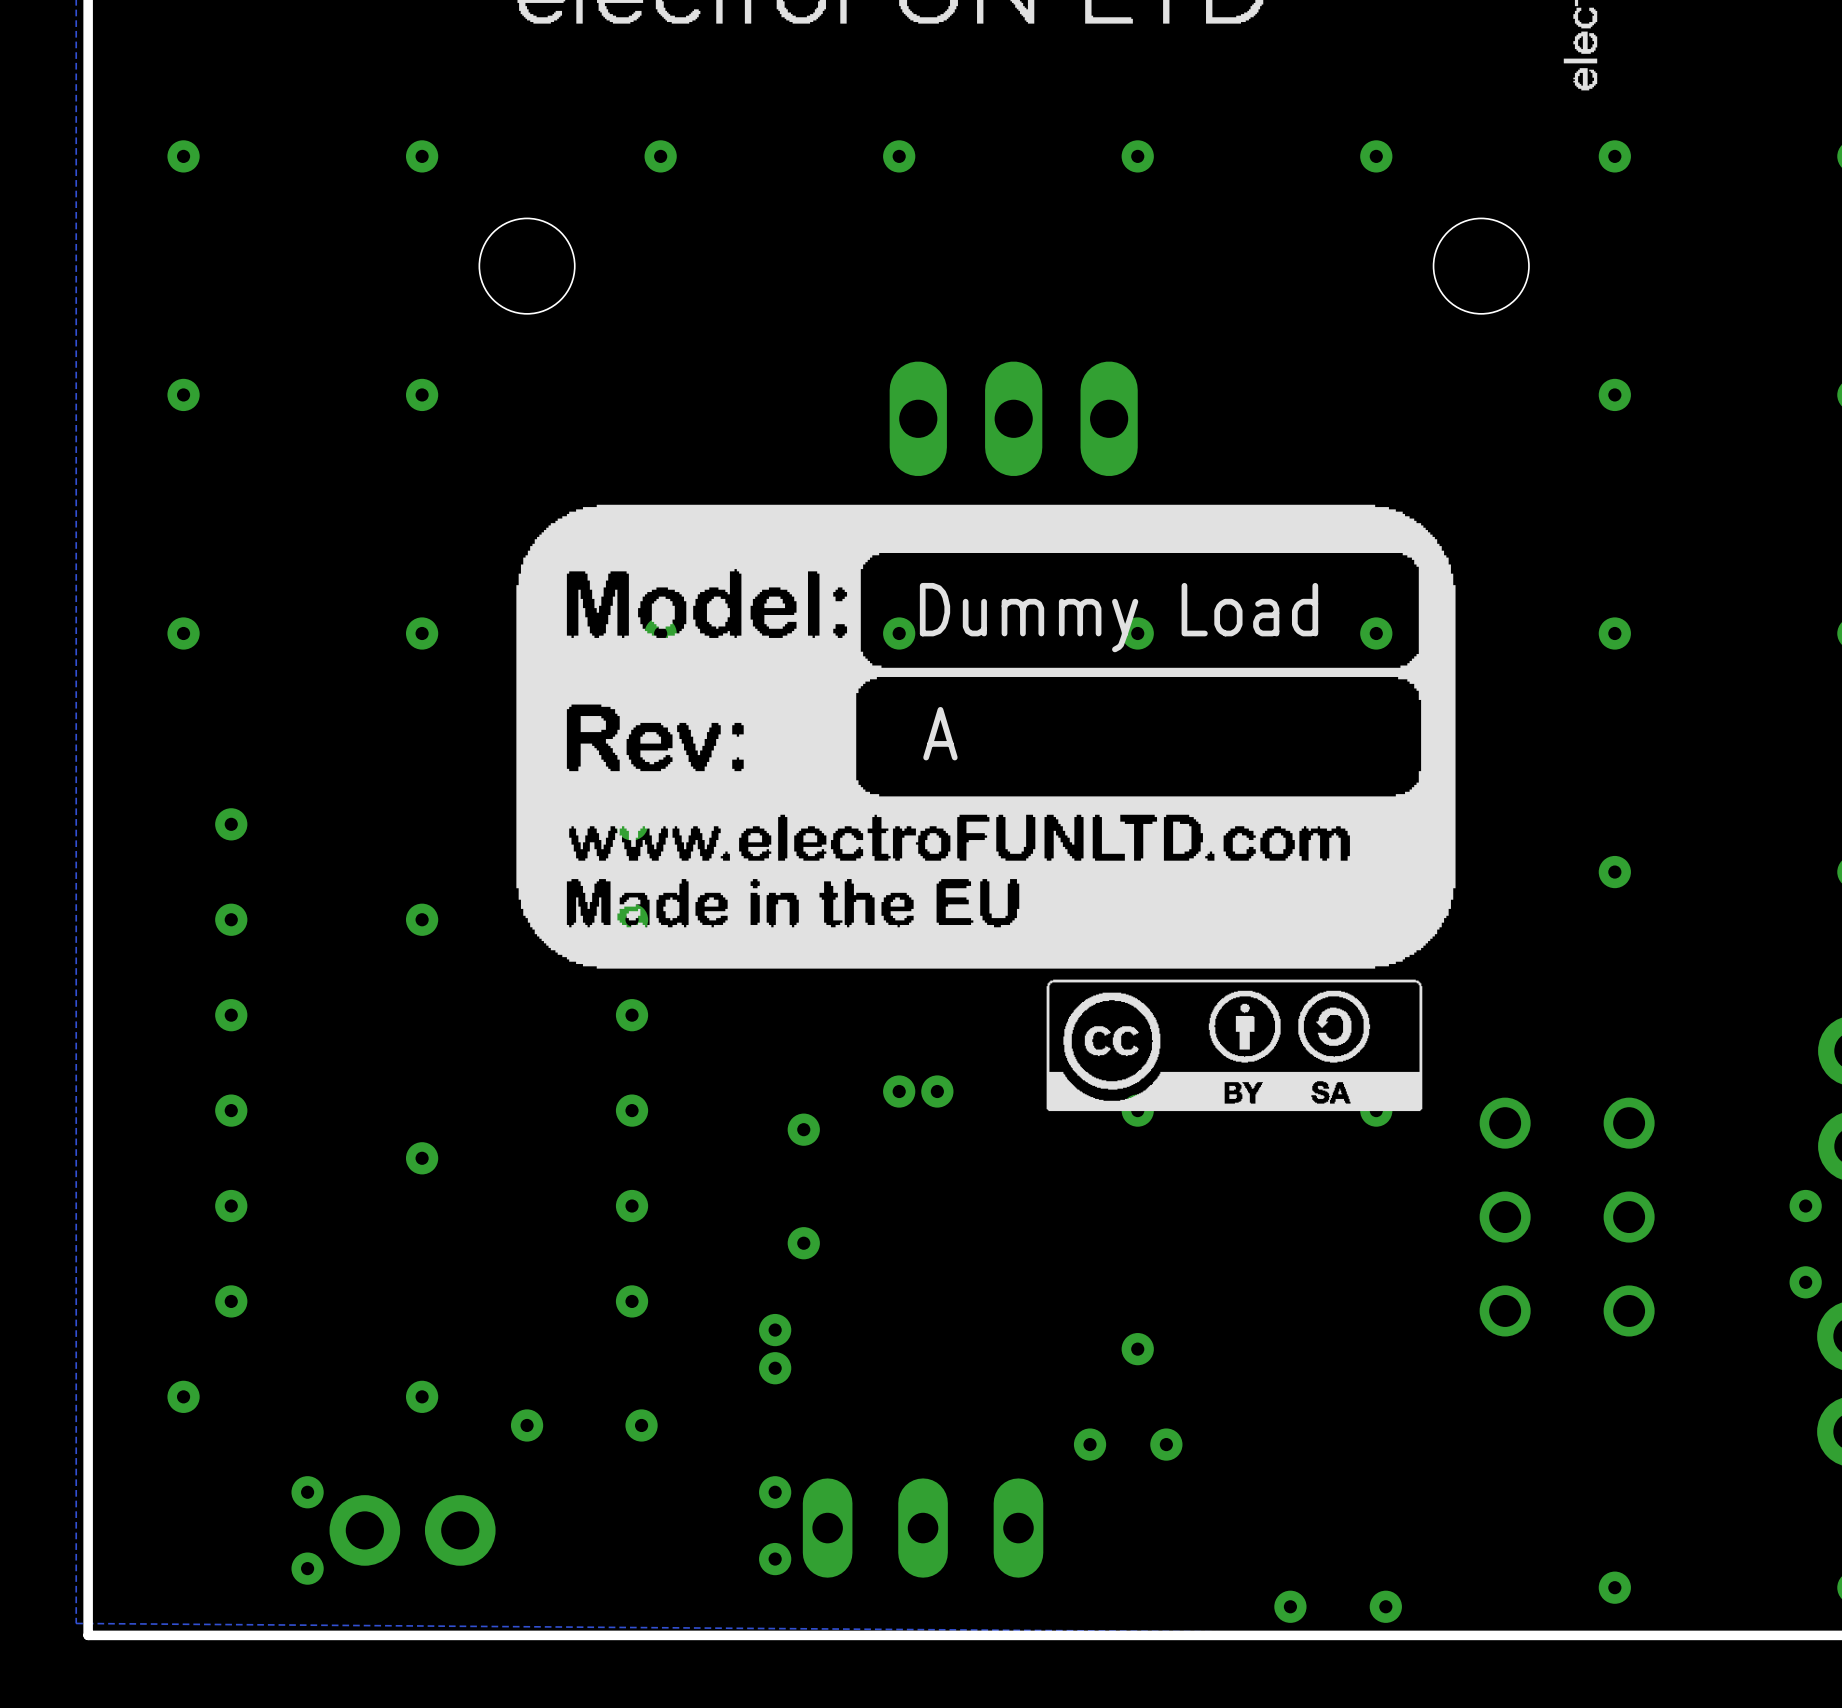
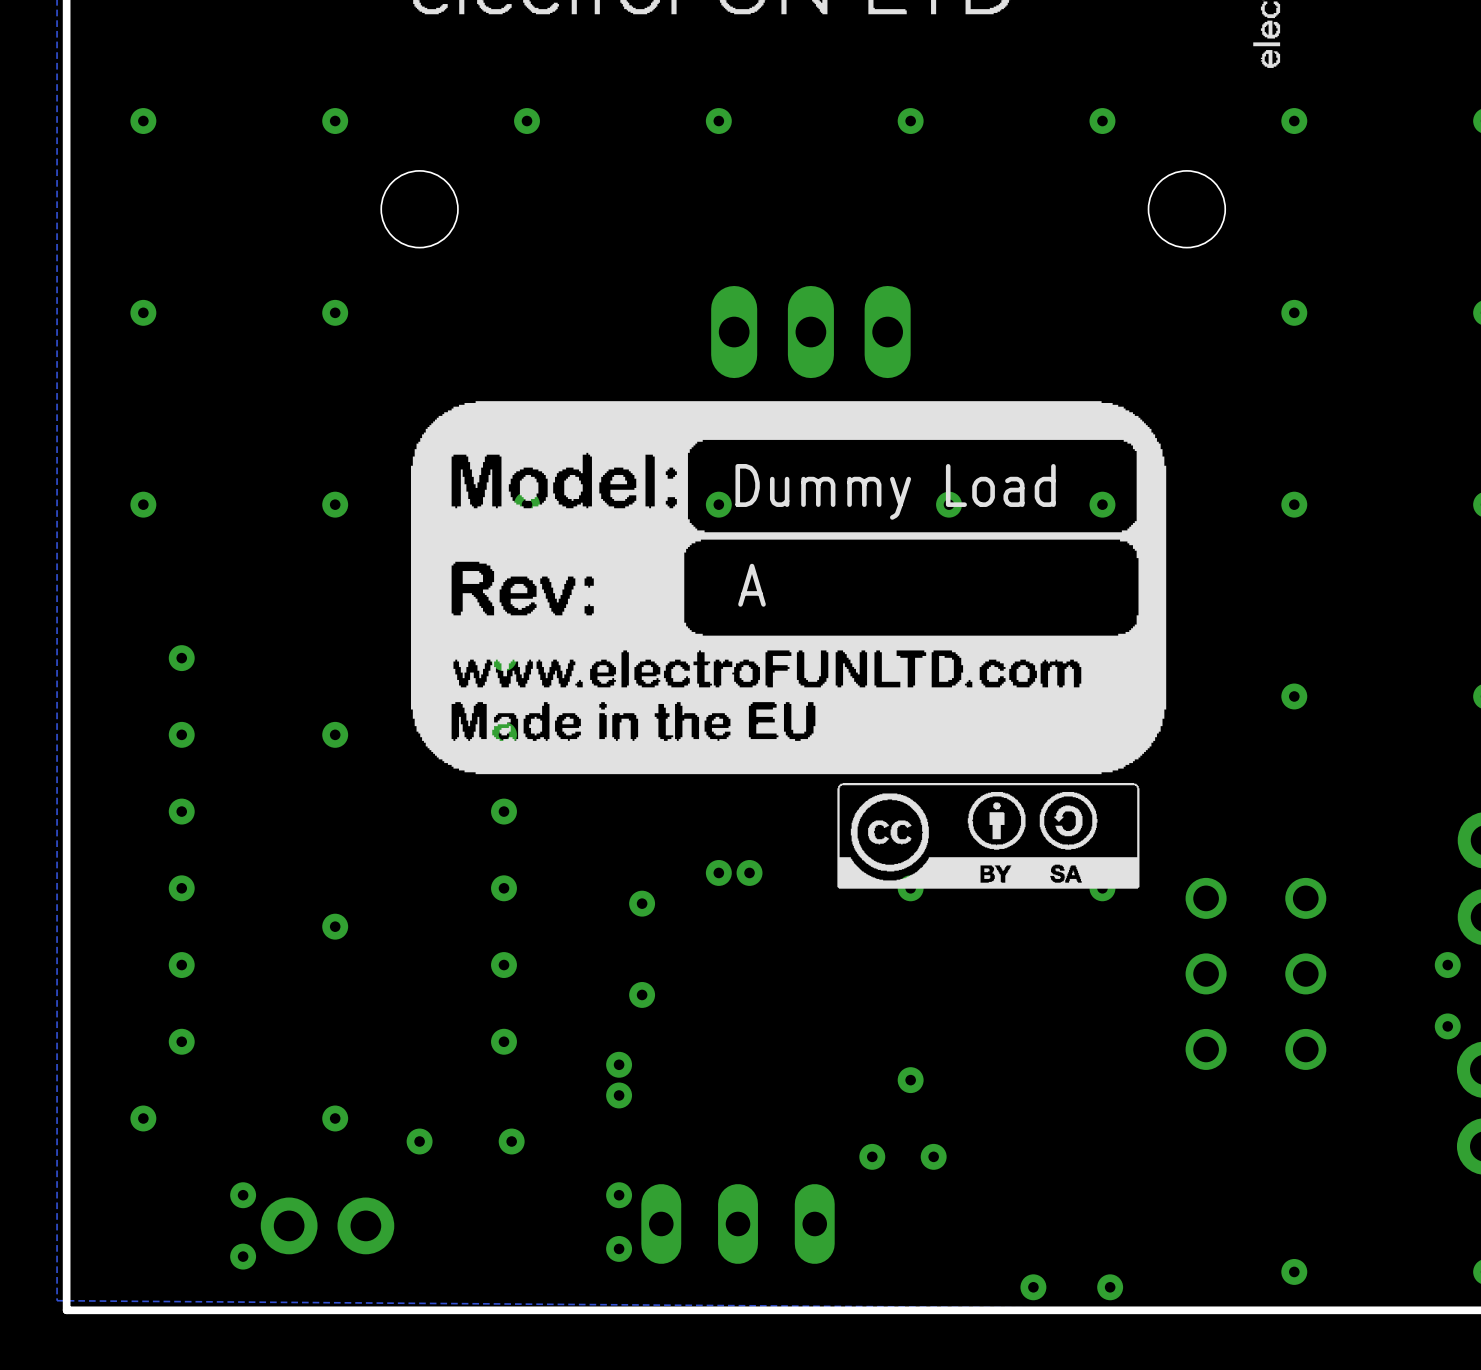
via position: (1137, 633) -> (949, 504)

